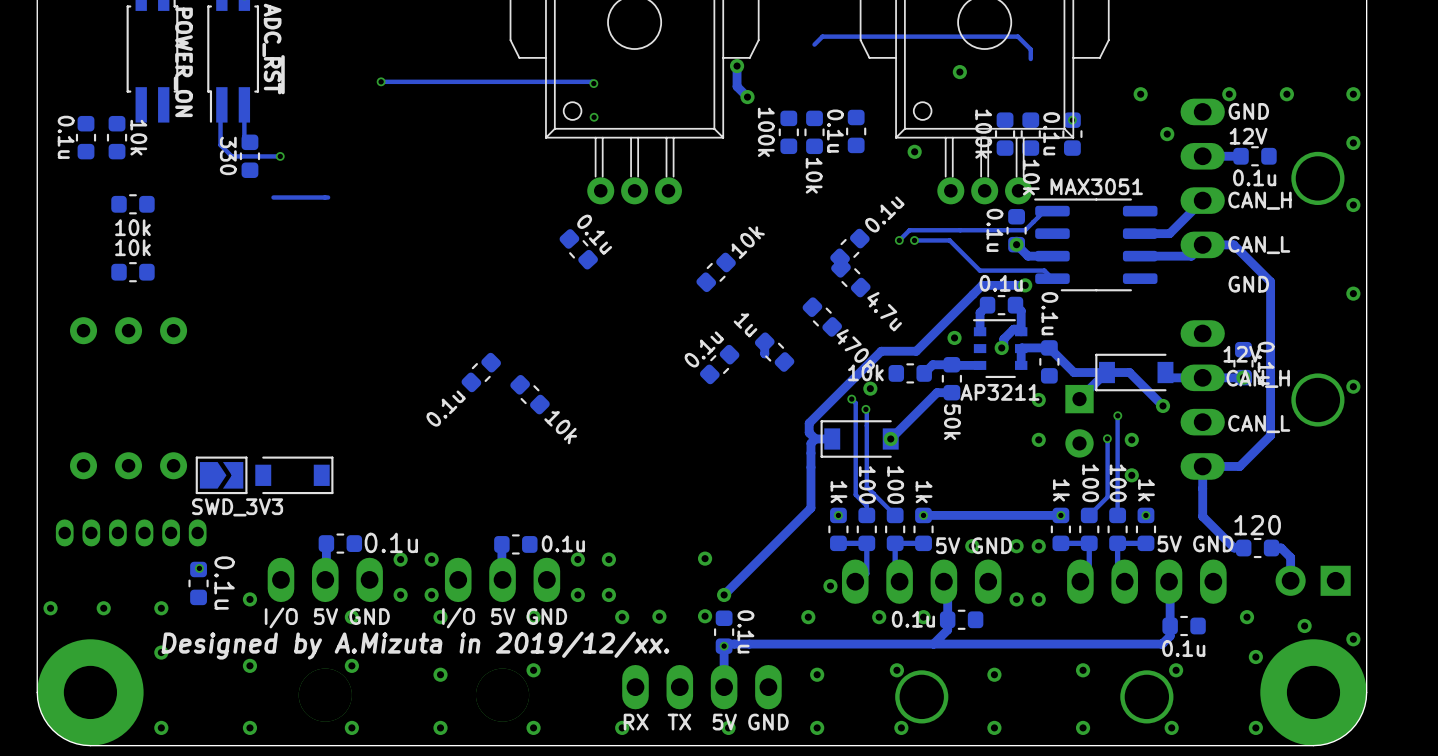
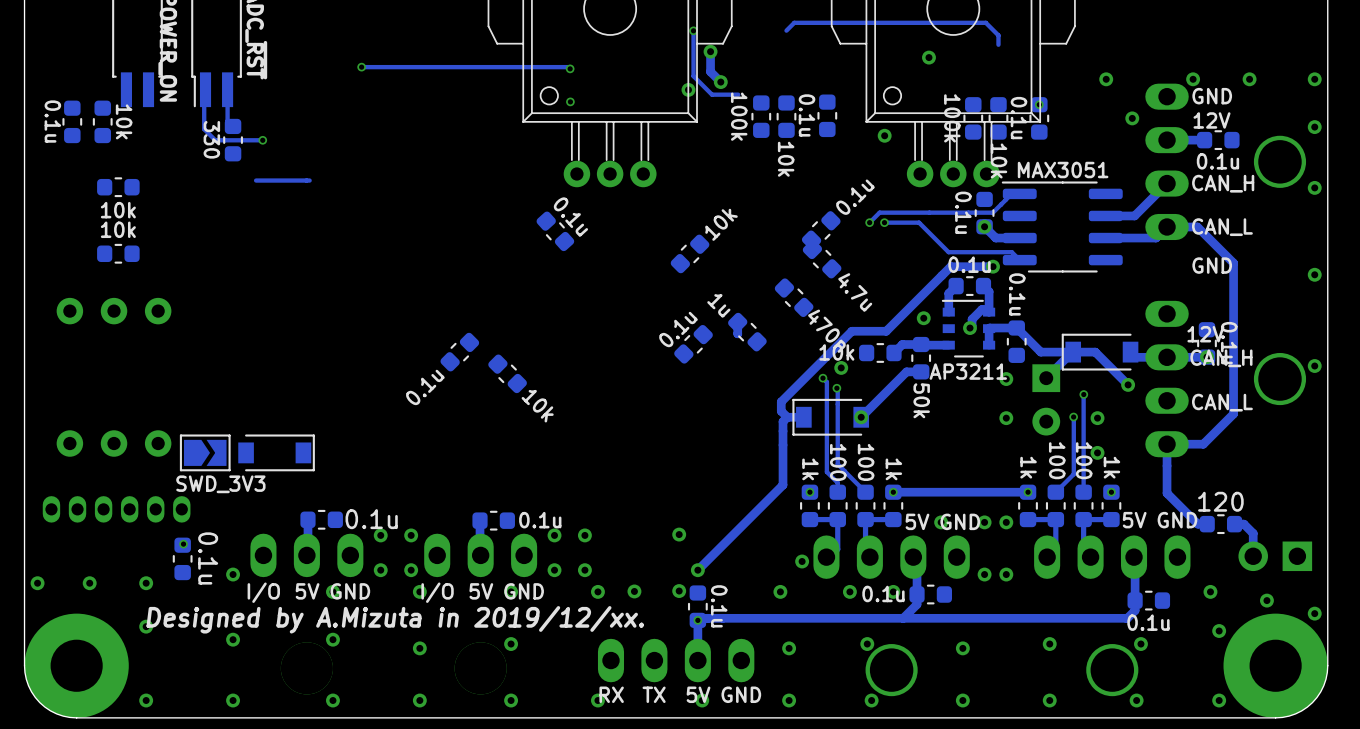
track: none -> (693, 30) (693, 76) (712, 94) (738, 94)
via: none -> (693, 30)
via: none -> (688, 89)

